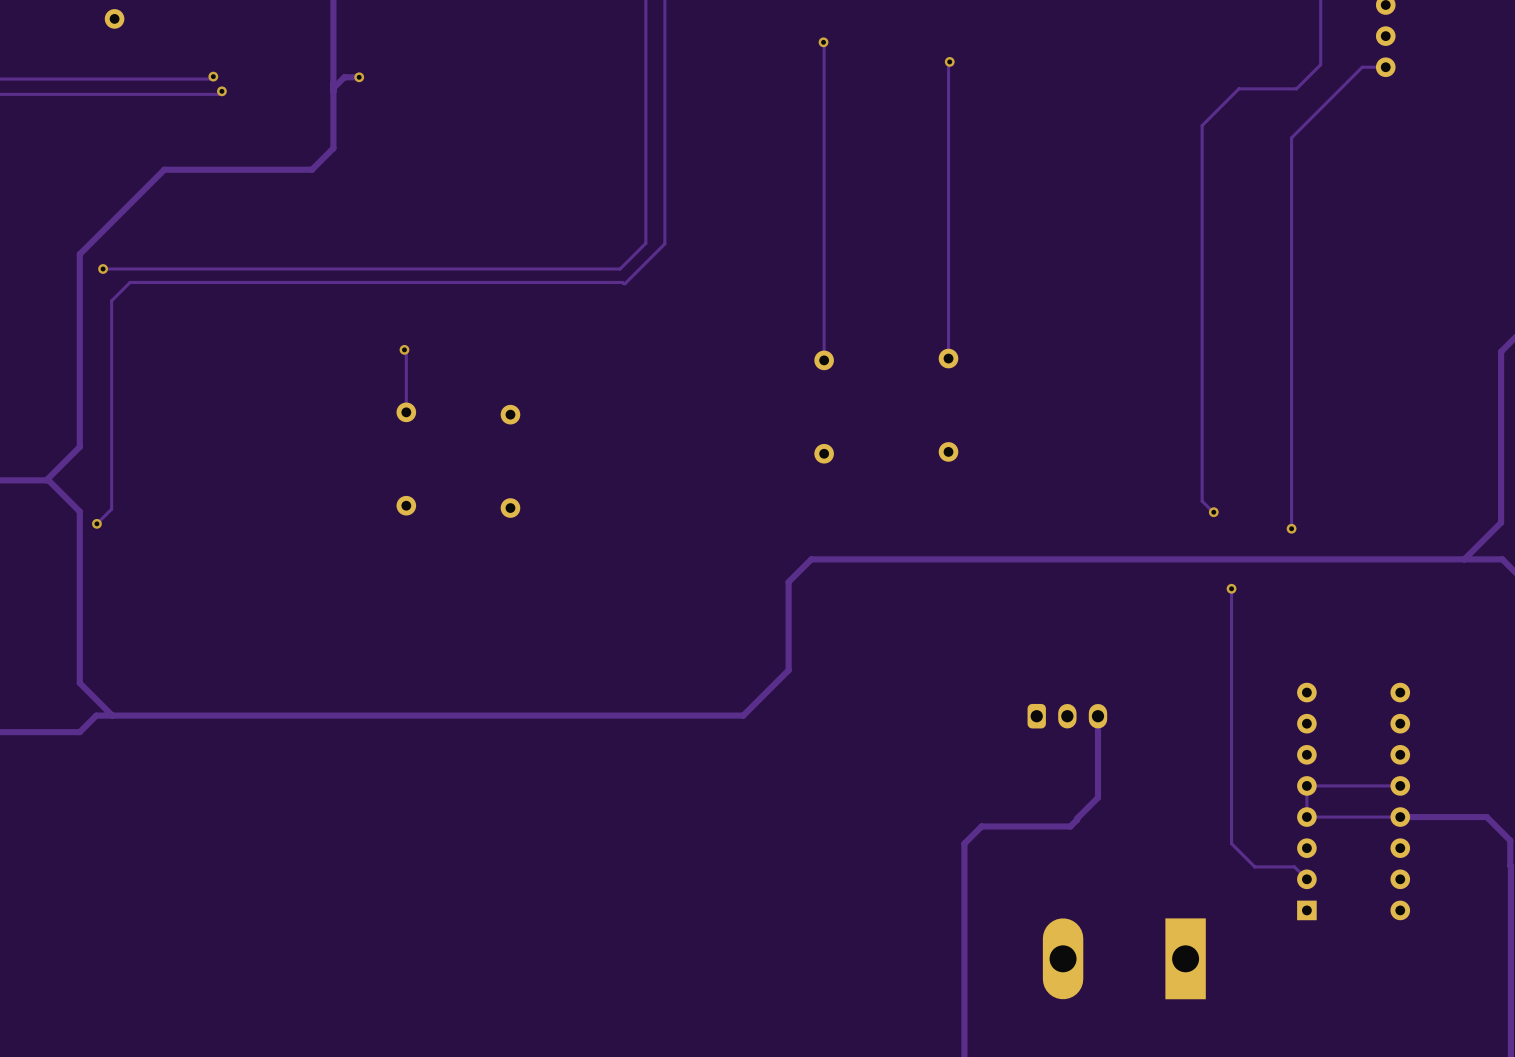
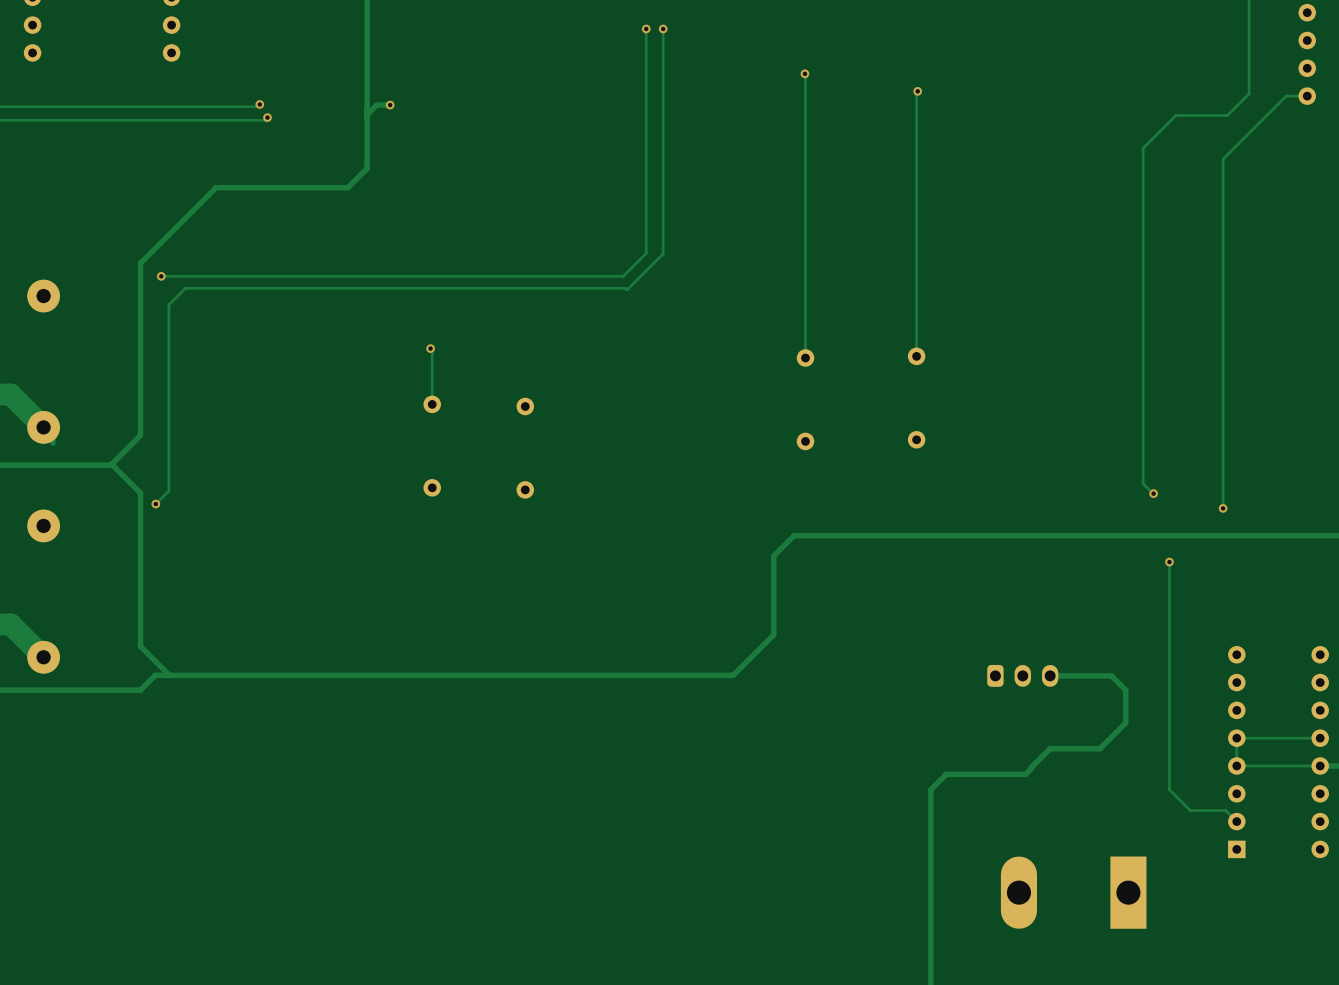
track: (1097, 716) (1097, 797) -> (1050, 675) (1111, 675) (1125, 690) (1125, 722) (1099, 748) (1050, 748)

